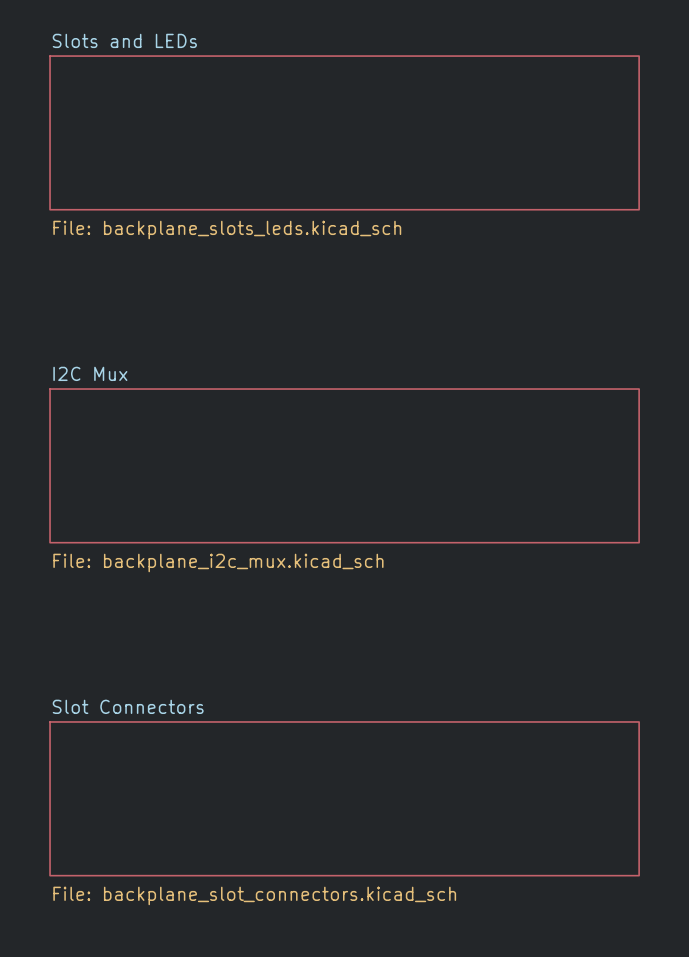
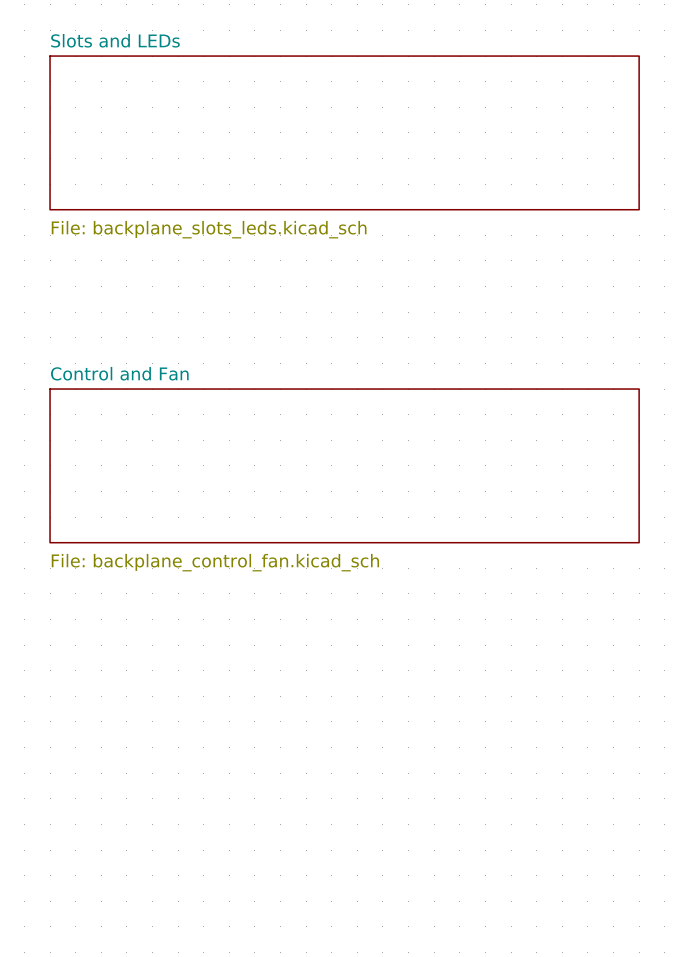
sheet I2C Mux name: I2C Mux (90, 373) -> Control and Fan (119, 373)
sheet I2C Mux value: File: backplane_i2c_mux.kicad_sch (218, 562) -> File: backplane_control_fan.kicad_sch (215, 562)
sheet Slot Connectors: File: backplane_slot_connectors.kicad_sch (344, 798) -> none

